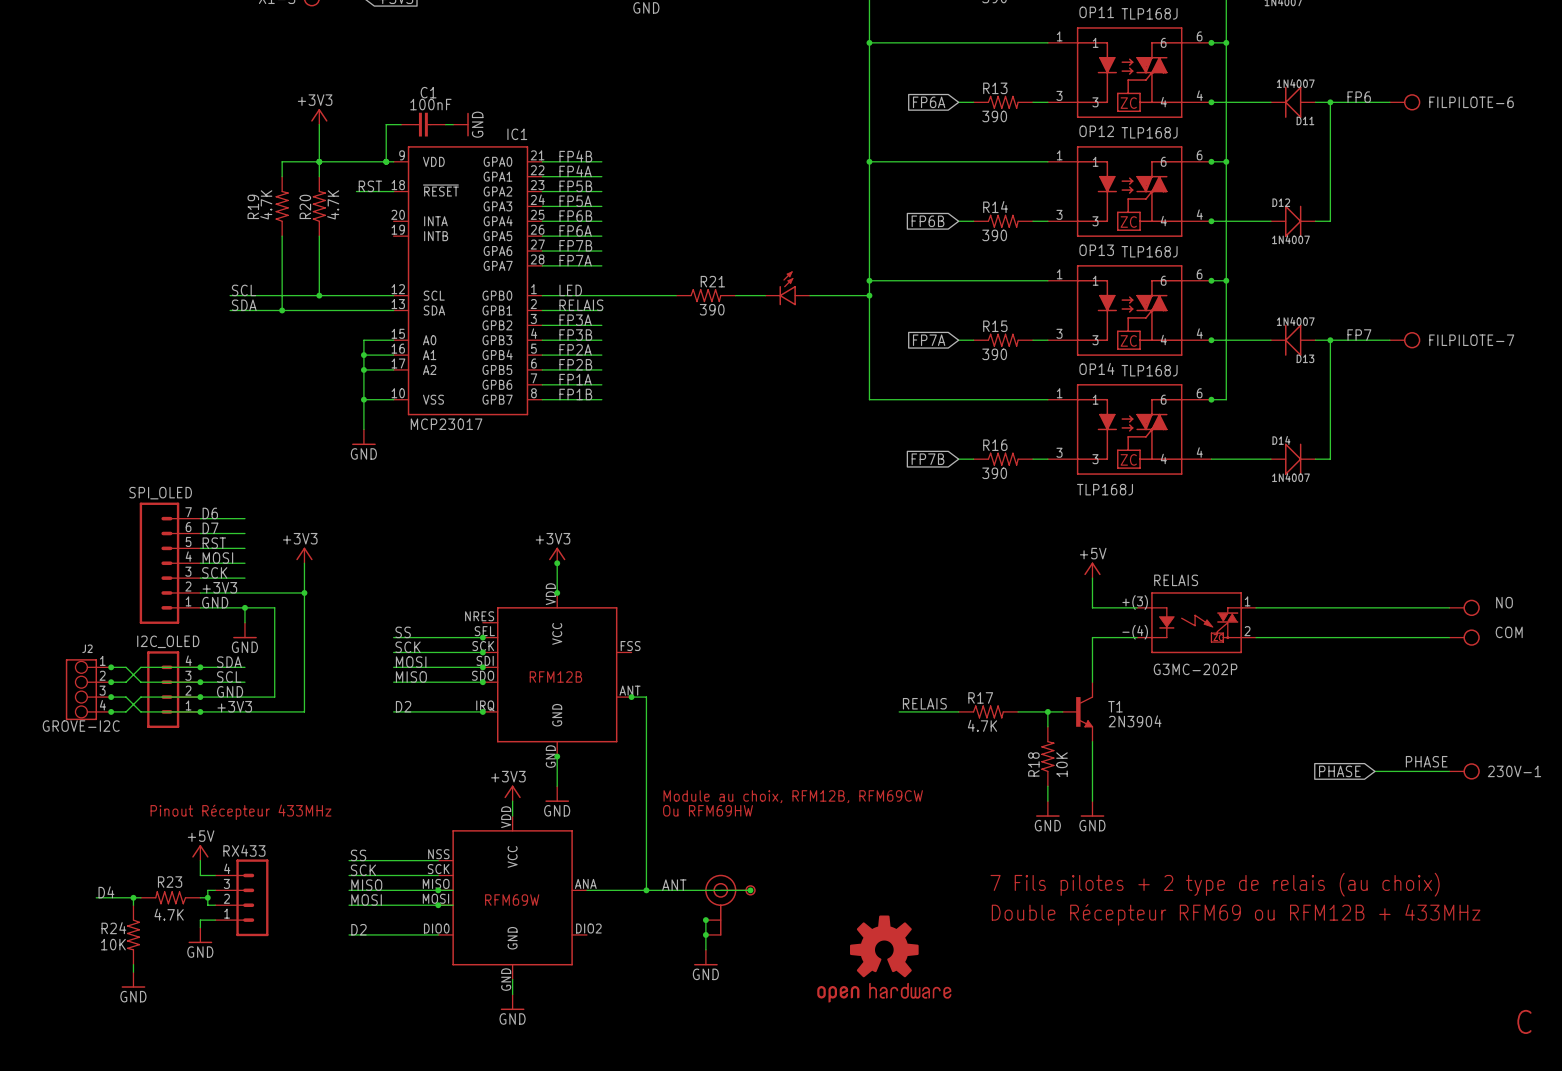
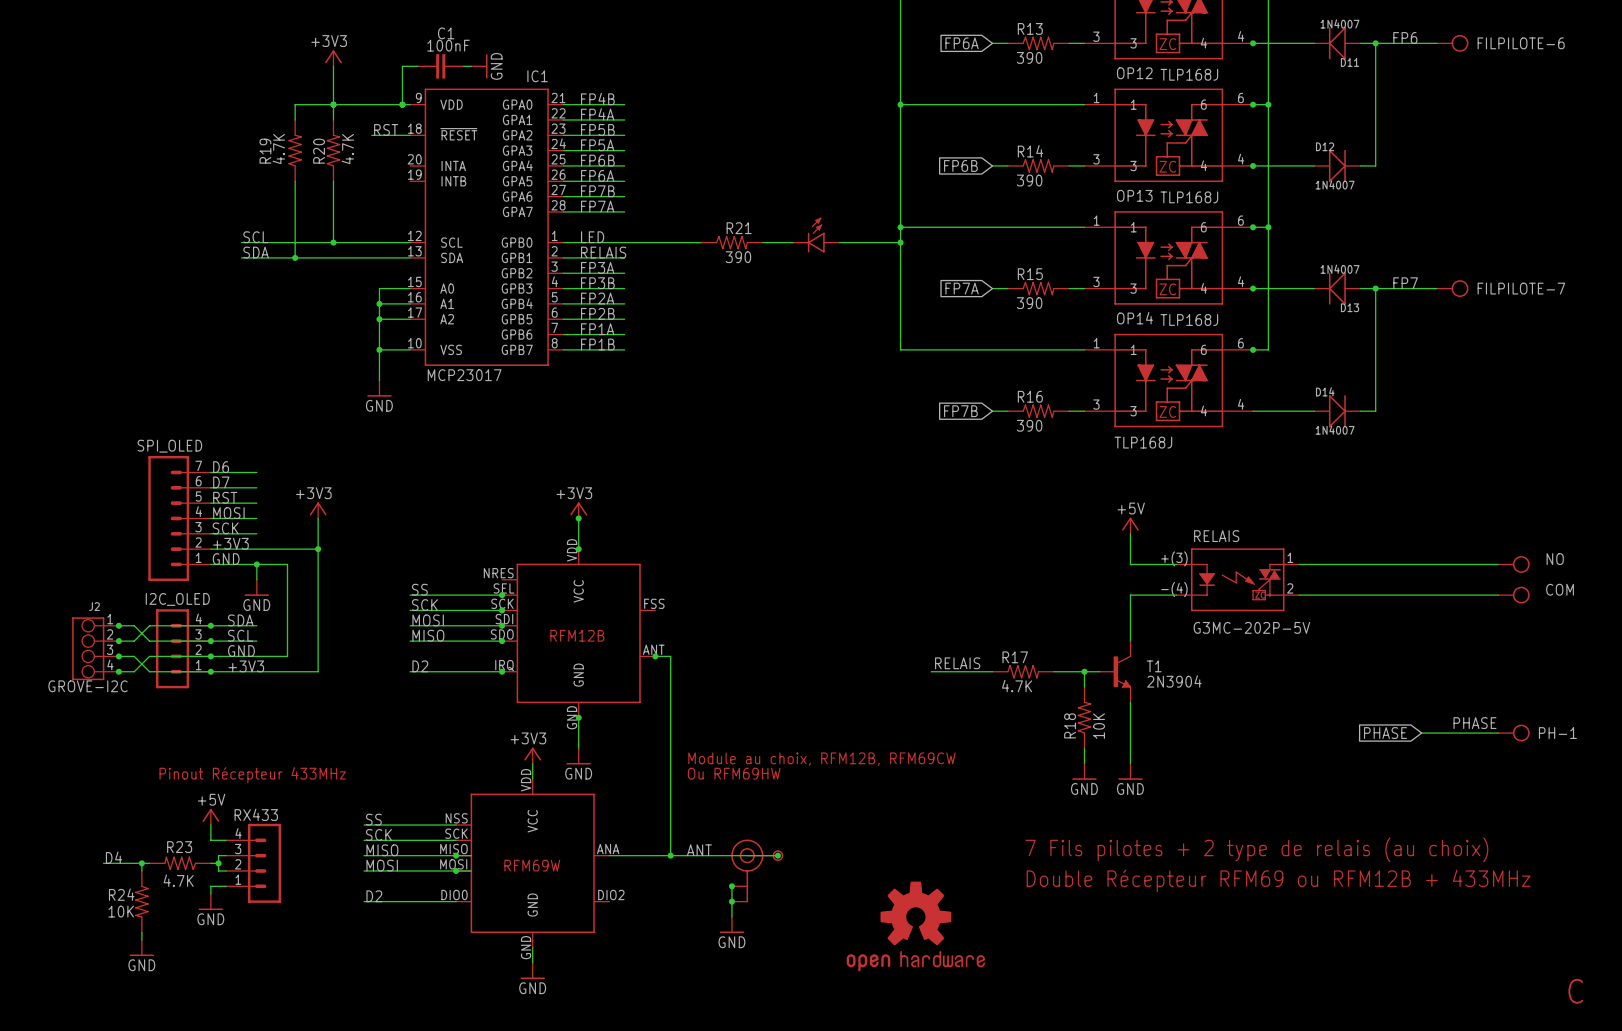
RELAIS value: G3MC-202P (1195, 669) -> G3MC-202P-5V (1251, 627)
230V-1 name: 230V-1 (1514, 771) -> PH-1 (1557, 733)

